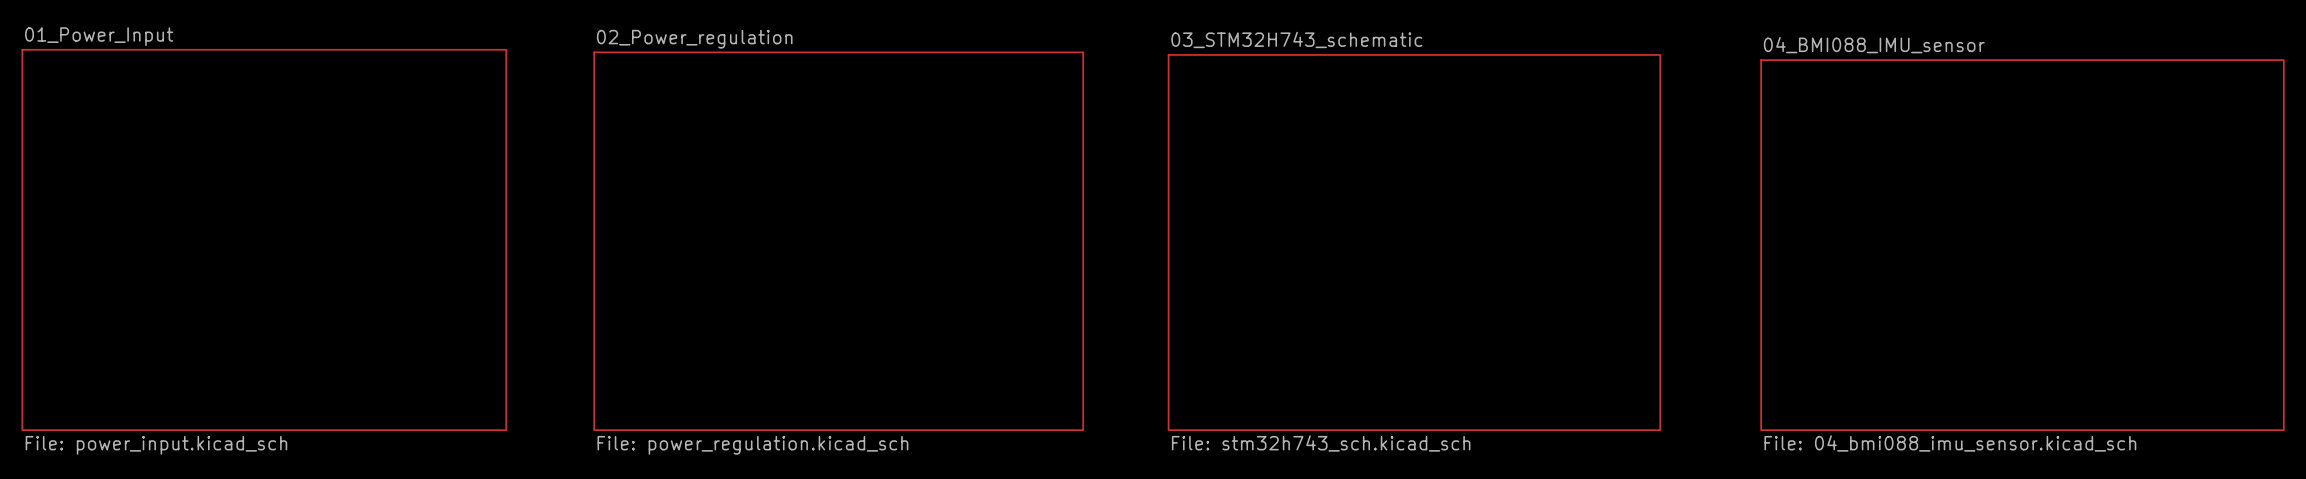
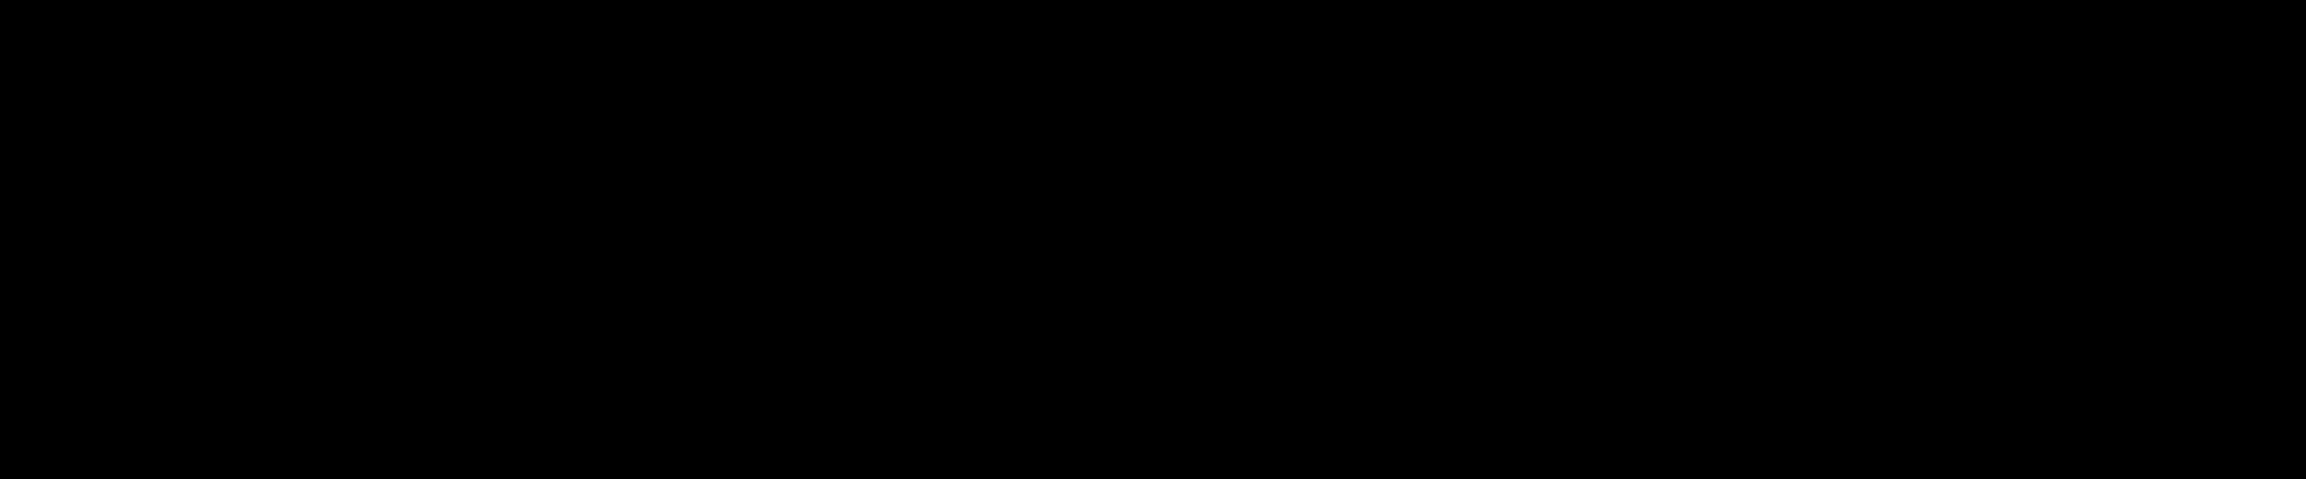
sheet 01_Power_Input: File: power_input.kicad_sch (264, 239) -> none
sheet 02_Power_regulation: File: power_regulation.kicad_sch (838, 241) -> none
sheet 03_STM32H743_schematic: File: stm32h743_sch.kicad_sch (1414, 242) -> none
sheet 04_BMI088_IMU_sensor: File: 04_bmi088_imu_sensor.kicad_sch (2022, 245) -> none

